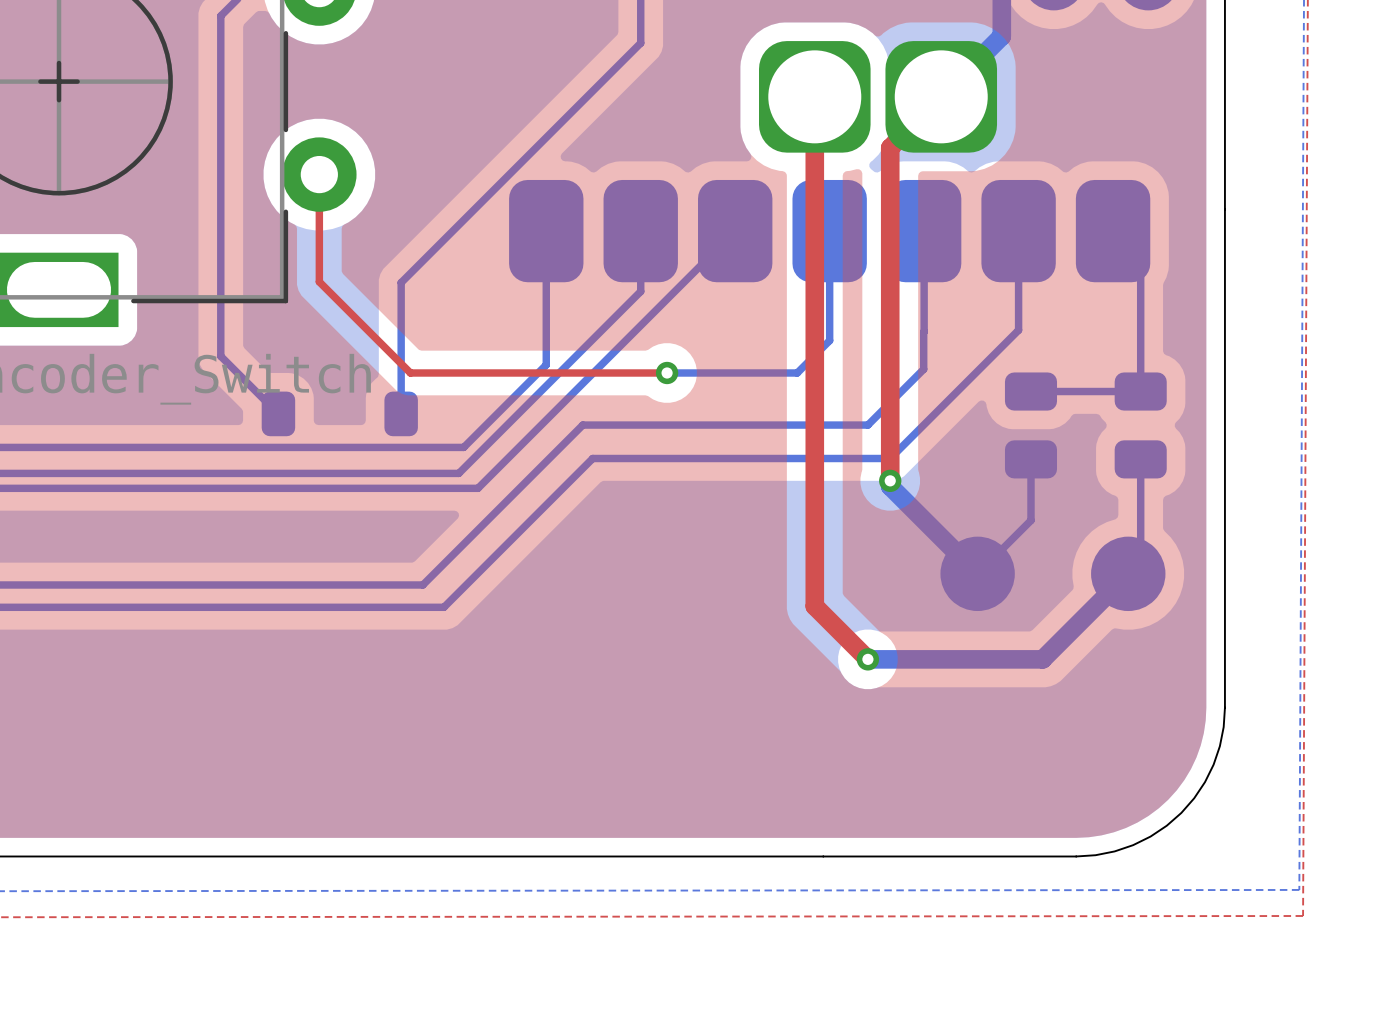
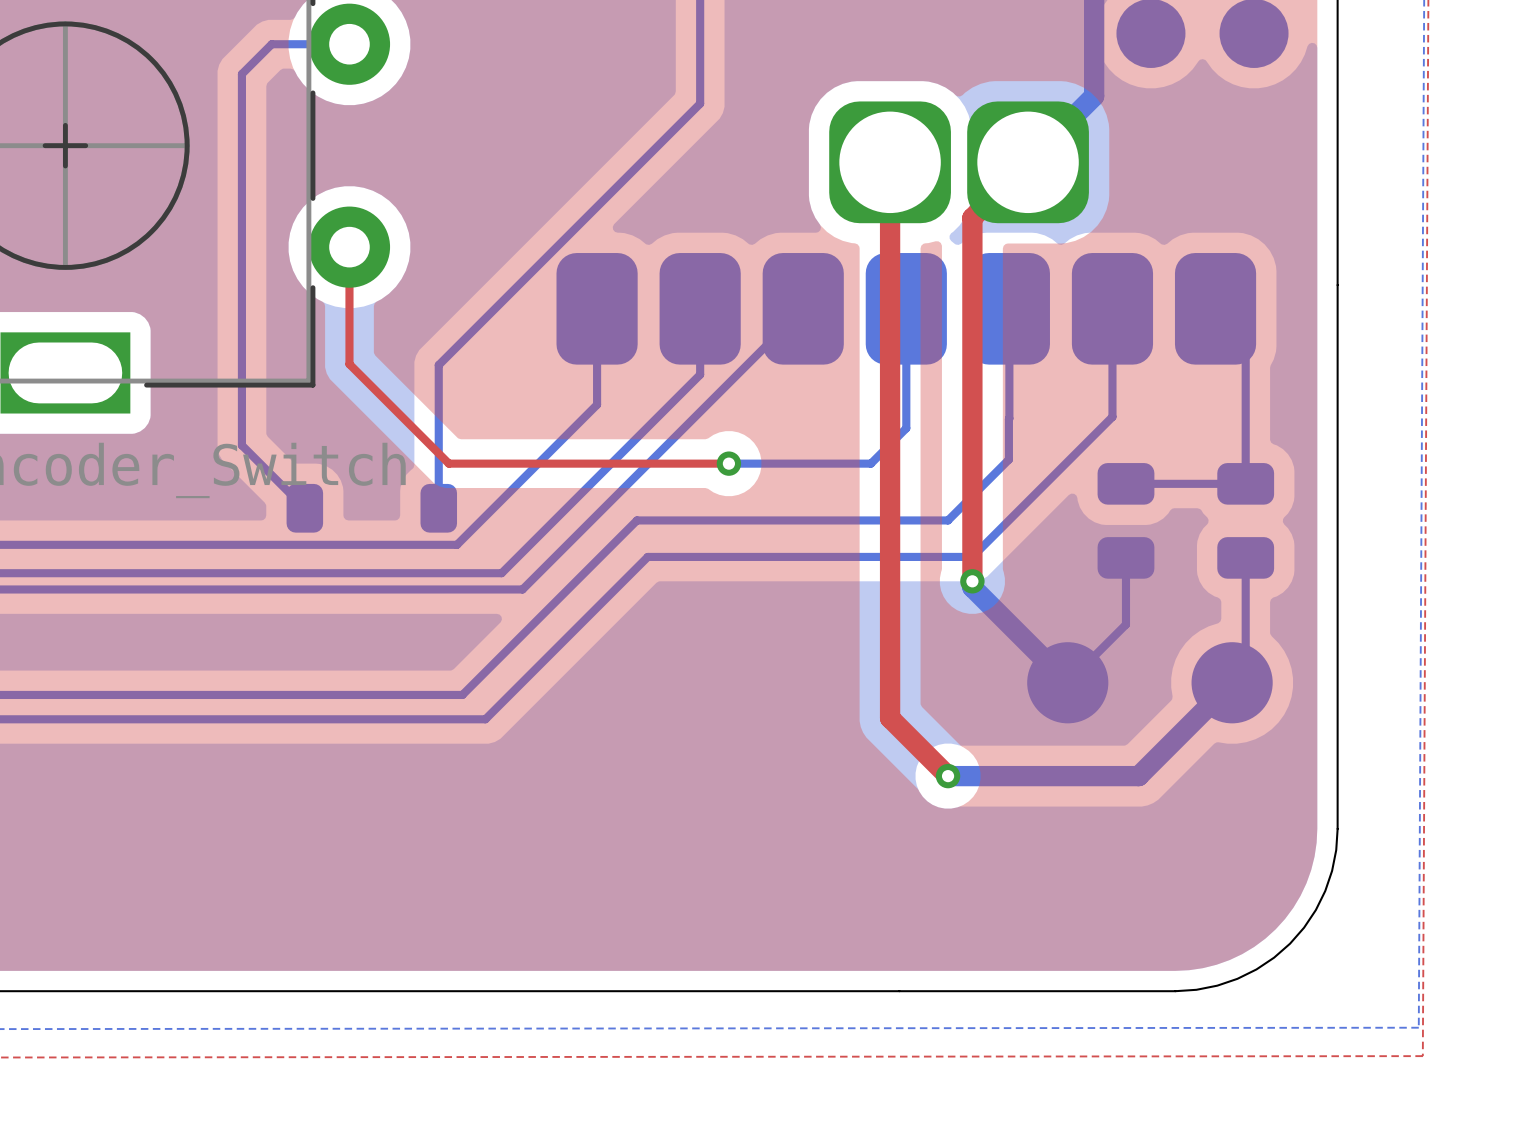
bottom track: (546, 319) (546, 364) (463, 447) (417, 447) -> (597, 404) (456, 544)

